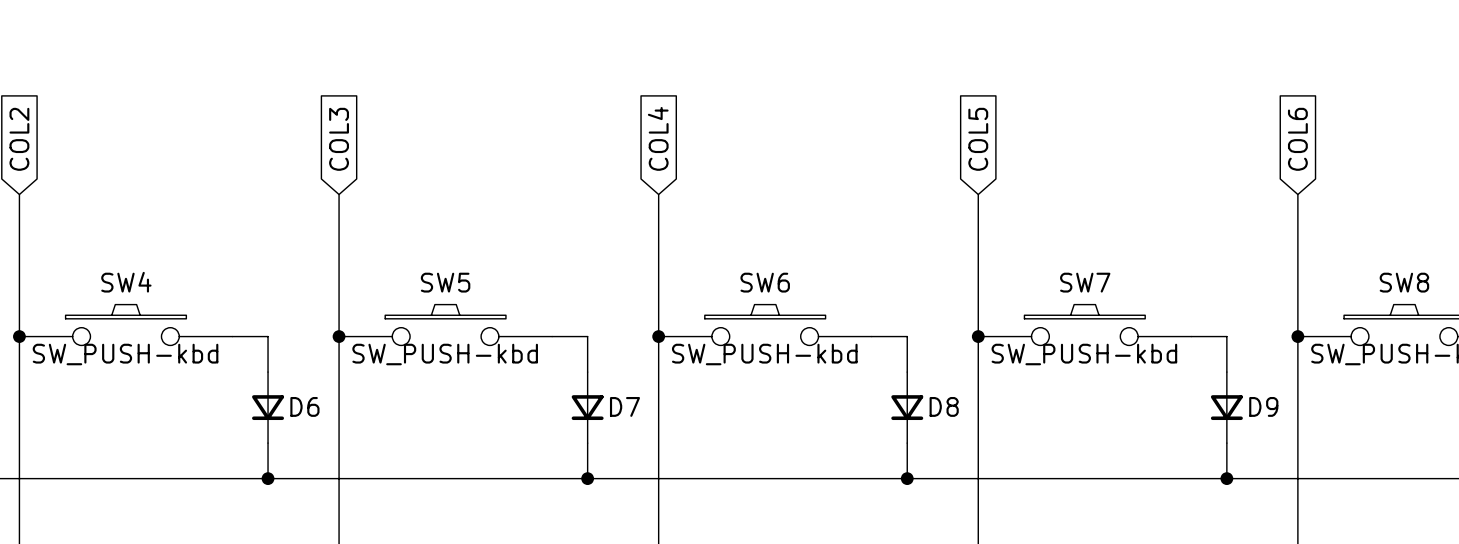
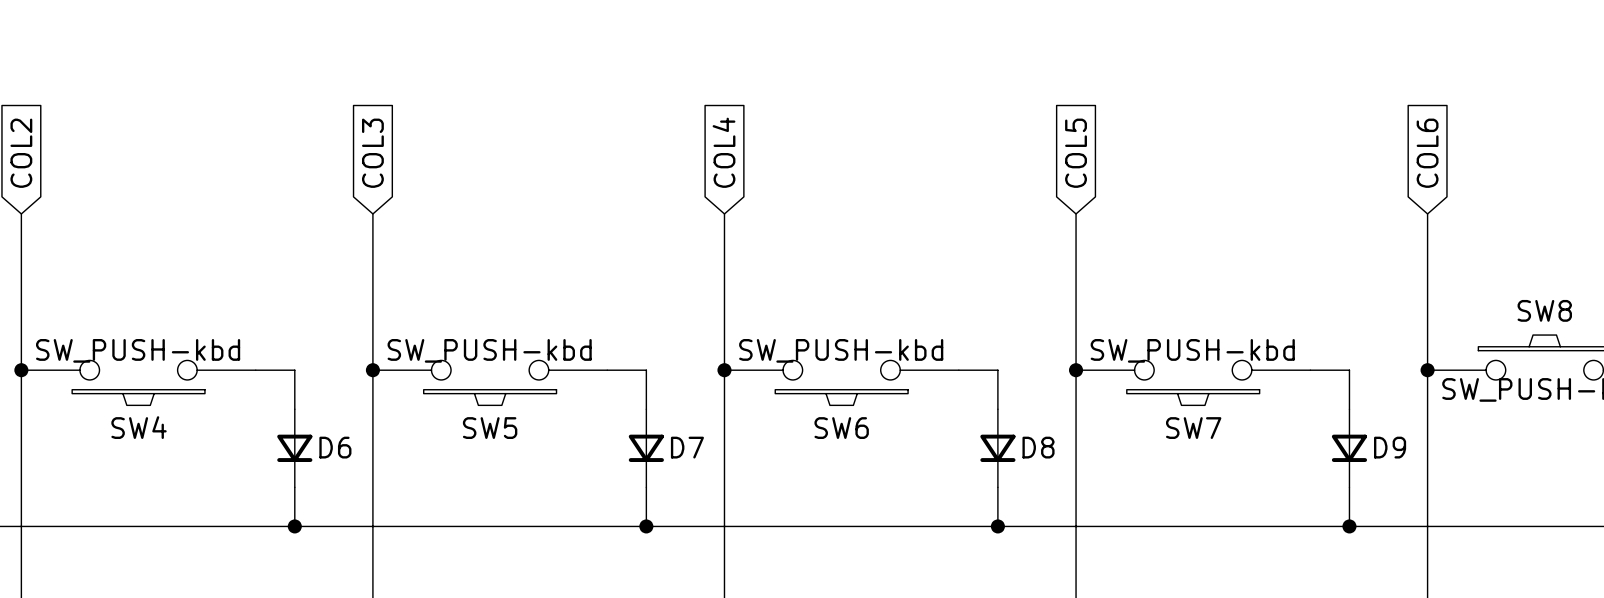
SW4 rotation: 0° (125, 311) -> 180° (138, 397)
SW5 rotation: 0° (445, 311) -> 180° (490, 397)
SW6 rotation: 0° (765, 311) -> 180° (841, 397)
SW7 rotation: 0° (1084, 311) -> 180° (1193, 397)

